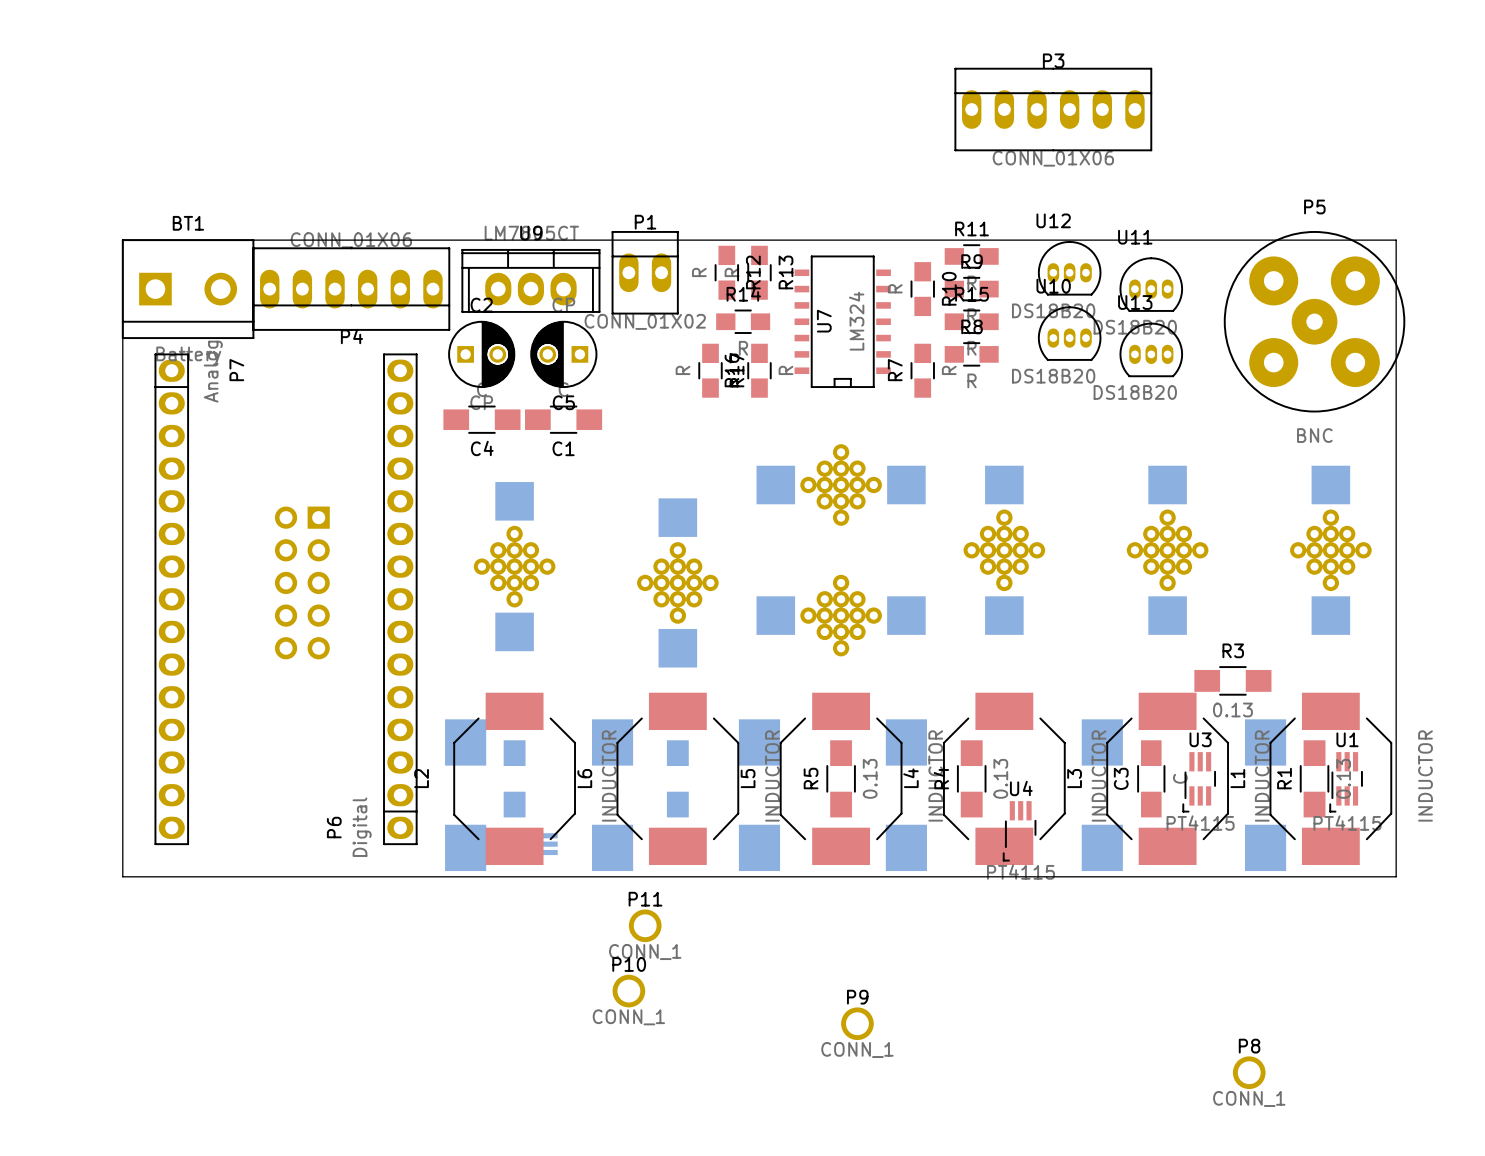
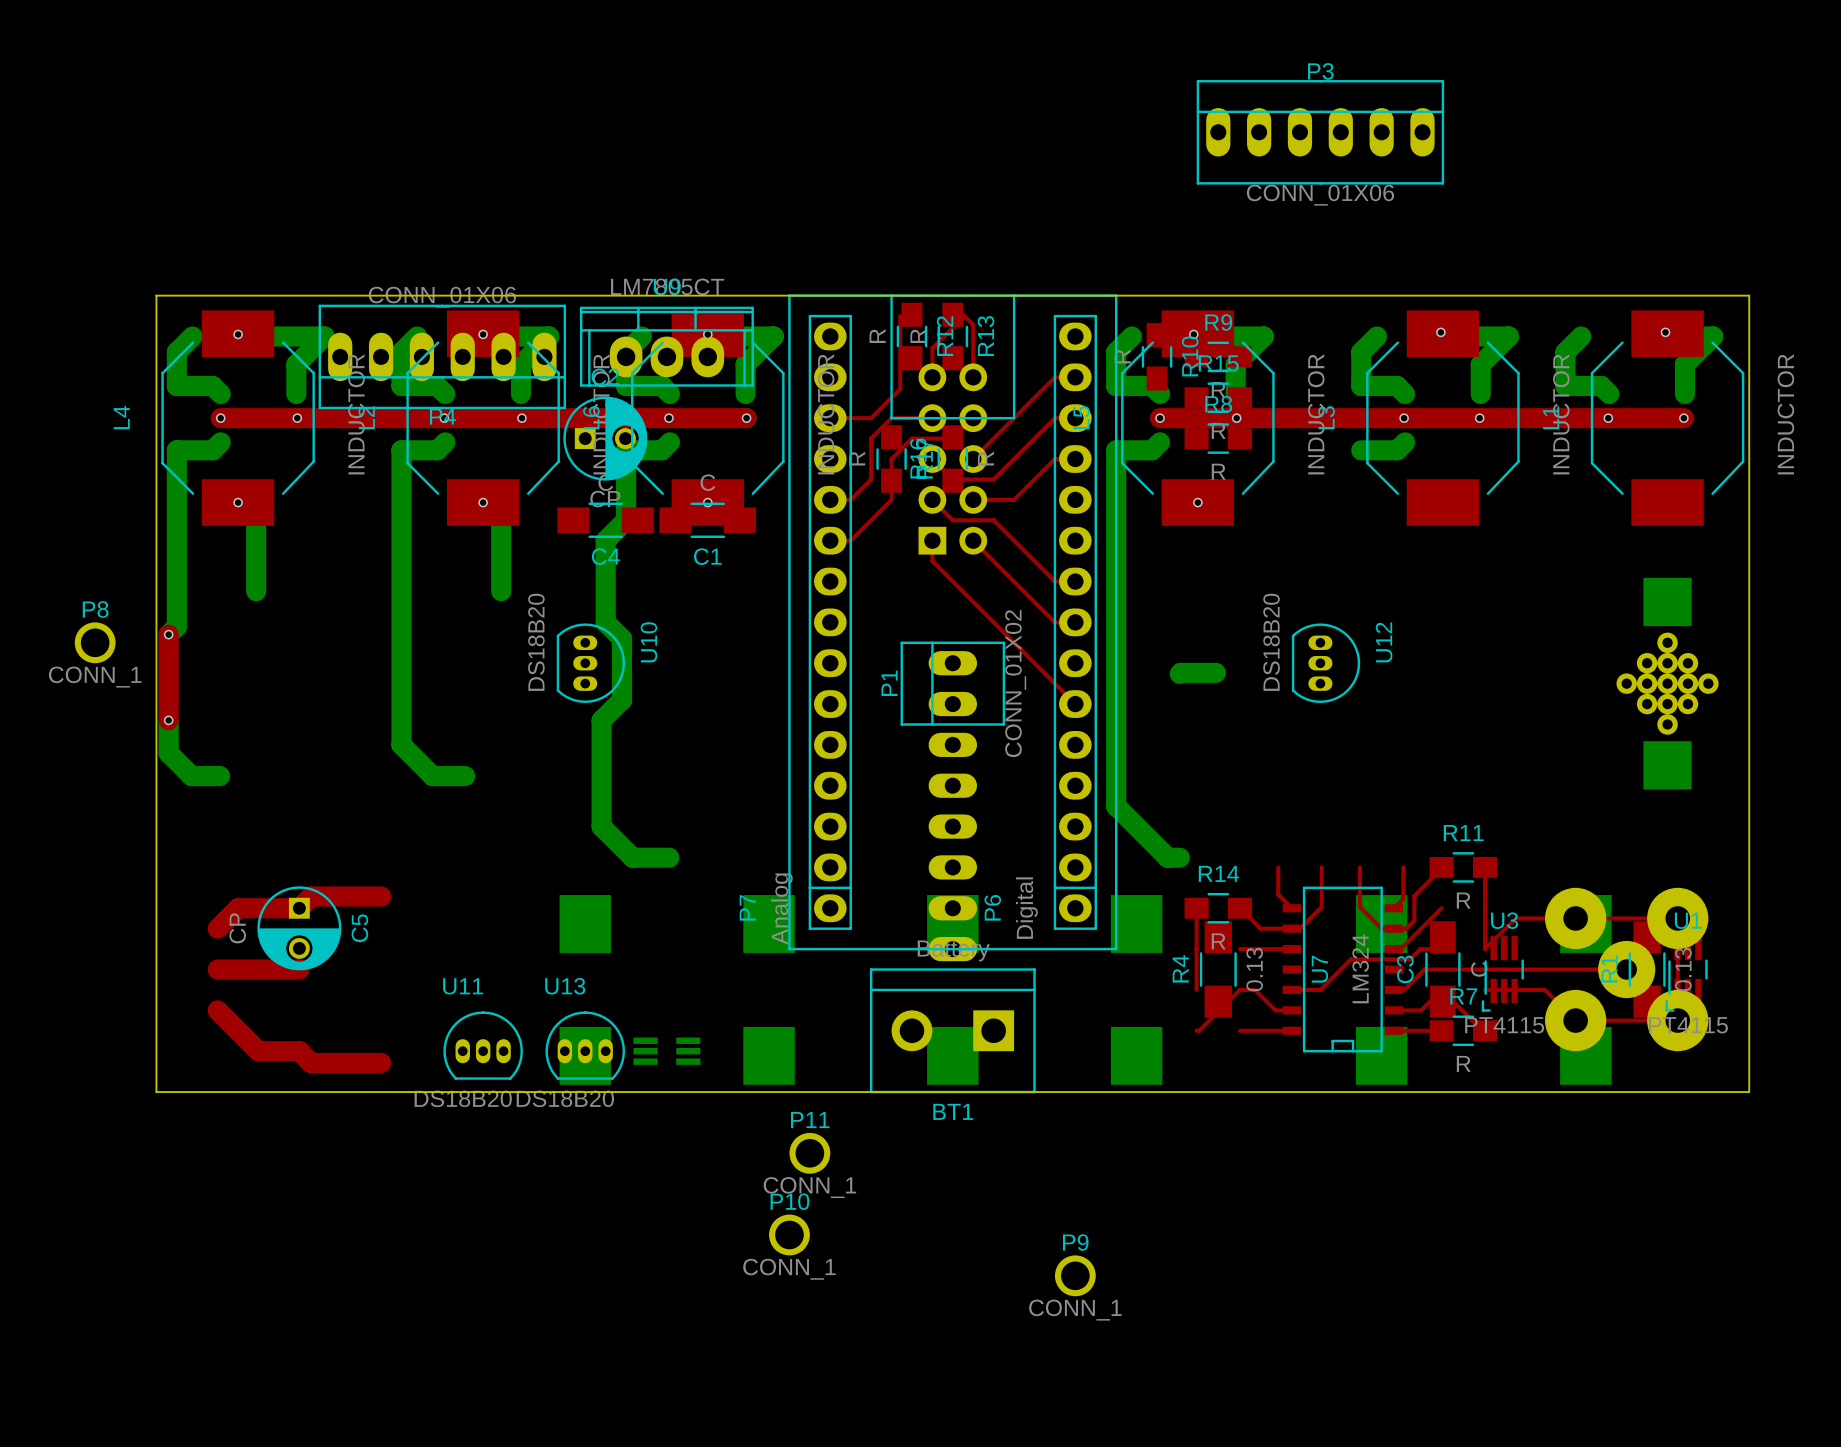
line: none -> (789, 295) (789, 949) (1116, 949) (1116, 295) (789, 295)
line: none -> (891, 295) (891, 418) (1014, 418) (1014, 295)
top track: none -> (900, 316) (900, 389) (871, 418) (830, 418)
R11 position: (971, 256) -> (1463, 867)
U12 rotation: 0° (1069, 268) -> 90° clockwise (1326, 663)
U12 position: (1069, 268) -> (1326, 663)
bottom track: none -> (1440, 332) (1444, 336) (1508, 336) (1480, 364) (1480, 394)
via: none -> (1440, 332)
bottom track: none -> (1665, 332) (1669, 336) (1713, 336) (1684, 364) (1684, 394)
via: none -> (1665, 332)
bottom track: none -> (238, 334) (240, 336) (324, 336) (296, 364) (296, 394)
via: none -> (238, 334)
bottom track: none -> (483, 334) (485, 336) (549, 336) (520, 364) (520, 394)
via: none -> (483, 334)
bottom track: none -> (707, 334) (709, 336) (773, 336) (745, 364) (745, 394)
via: none -> (707, 334)
bottom track: none -> (1193, 334) (1195, 336) (1263, 336) (1235, 364) (1235, 394)
via: none -> (1193, 334)
bottom track: none -> (192, 336) (176, 352) (176, 386) (212, 386) (220, 394)
bottom track: none -> (417, 336) (401, 352) (401, 386) (437, 386) (445, 394)
bottom track: none -> (641, 336) (626, 352) (626, 386) (661, 386) (669, 394)
P1 rotation: 0° (645, 272) -> 90° counterclockwise (952, 683)
P1 position: (645, 272) -> (952, 683)
bottom track: none -> (1131, 336) (1116, 352) (1116, 386) (1152, 386) (1160, 394)
bottom track: none -> (1376, 336) (1361, 352) (1361, 386) (1397, 386) (1405, 394)
bottom track: none -> (1581, 336) (1565, 352) (1565, 386) (1601, 386) (1609, 394)
U11 position: (1151, 284) -> (483, 1045)
BT1 rotation: 0° (188, 289) -> 180° (952, 1030)
BT1 position: (188, 289) -> (952, 1030)
top track: none -> (932, 377) (932, 348) (964, 316) (973, 324) (973, 377)
top track: none -> (1075, 377) (1054, 377) (973, 459)
R14 position: (743, 321) -> (1218, 908)
U7 position: (842, 321) -> (1342, 969)
P5: BNC (1314, 321) -> none
U10 rotation: 0° (1069, 333) -> 90° clockwise (590, 663)
U10 position: (1069, 333) -> (590, 663)
top track: none -> (220, 418) (746, 418)
via: none -> (220, 418)
via: none -> (297, 418)
via: none -> (444, 418)
via: none -> (521, 418)
via: none -> (668, 418)
via: none -> (746, 418)
top track: none -> (932, 418) (891, 418) (871, 438) (871, 479) (850, 499) (830, 499)
top track: none -> (973, 418) (952, 438) (911, 438) (891, 459) (891, 499) (850, 540) (830, 540)
top track: none -> (1075, 418) (1054, 418) (993, 479) (952, 479) (932, 459)
top track: none -> (1160, 418) (1683, 418)
via: none -> (1160, 418)
via: none -> (1236, 418)
via: none -> (1404, 418)
via: none -> (1479, 418)
via: none -> (1608, 418)
via: none -> (1683, 418)
U13 position: (1151, 349) -> (585, 1045)
C5 rotation: 0° (563, 354) -> 90° counterclockwise (299, 928)
C5 position: (563, 354) -> (299, 928)
bottom track: none -> (220, 442) (212, 450) (176, 450) (176, 626) (168, 634)
bottom track: none -> (445, 442) (437, 450) (401, 450) (401, 744) (432, 776) (465, 776)
bottom track: none -> (669, 442) (661, 450) (626, 450) (626, 520) (605, 540) (605, 622) (622, 638) (622, 699) (601, 720) (601, 826) (632, 857) (669, 857)
bottom track: none -> (1160, 442) (1152, 450) (1116, 450) (1116, 806) (1167, 857) (1179, 857)
bottom track: none -> (1405, 442) (1397, 450) (1361, 450)
part: none -> (952, 459)
top track: none -> (1075, 459) (1054, 459) (1014, 499) (973, 499)
R7 rotation: 0° (922, 370) -> 90° clockwise (1463, 1030)
R7 position: (922, 370) -> (1463, 1030)
top track: none -> (932, 499) (952, 520) (993, 520) (1054, 581) (1075, 581)
bottom track: none -> (238, 502) (256, 520) (256, 591)
via: none -> (238, 502)
bottom track: none -> (483, 502) (501, 520) (501, 591)
via: none -> (483, 502)
via: none -> (707, 502)
via: none -> (1197, 502)
top track: none -> (932, 540) (932, 561) (1075, 704)
top track: none -> (973, 540) (1054, 622) (1075, 622)
part: (841, 484) -> none
top track: none -> (168, 634) (168, 720)
via: none -> (168, 634)
bottom track: none -> (1215, 672) (1179, 673)
part: (1004, 550) -> none
part: (1167, 550) -> none
part: (514, 566) -> none
bottom track: none -> (168, 720) (168, 753) (191, 776) (220, 776)
via: none -> (168, 720)
part: (302, 582) -> none
part: (677, 582) -> none
P7 rotation: 0° (171, 599) -> 180° (830, 622)
P7 position: (171, 599) -> (830, 622)
P6 position: (400, 599) -> (1075, 622)
part: (841, 615) -> none
part: none -> (952, 846)
R3: 0.13 (1232, 680) -> none
top track: none -> (1278, 867) (1278, 894) (1291, 908)
top track: none -> (1321, 867) (1321, 906) (1299, 928) (1260, 928) (1240, 908)
top track: none -> (1359, 867) (1359, 906) (1381, 928) (1406, 928) (1414, 920) (1414, 896) (1441, 867)
top track: none -> (1403, 867) (1403, 898) (1393, 908)
top track: none -> (1485, 867) (1485, 949) (1515, 918) (1677, 918) (1677, 1020) (1575, 1020) (1545, 989) (1485, 989)
top track: none -> (381, 896) (311, 896) (299, 908) (238, 908) (217, 928)
top track: none -> (1196, 908) (1196, 989)
top track: none -> (1441, 908) (1400, 949) (1393, 949)
top track: none -> (1240, 949) (1291, 949)
top track: none -> (1441, 949) (1420, 949) (1410, 959) (1351, 959) (1320, 989) (1291, 989)
top track: none -> (217, 969) (299, 969)
L2 position: (514, 778) -> (483, 418)
part: (514, 778) -> none
L6 position: (677, 778) -> (707, 418)
part: (677, 778) -> none
L5 position: (841, 778) -> (1197, 418)
R5: 0.13 (841, 778) -> none
L4 position: (1004, 778) -> (238, 418)
L3 position: (1167, 778) -> (1442, 418)
top track: none -> (1626, 969) (1424, 969) (1404, 989) (1393, 989)
part: none -> (1626, 969)
L1 position: (1330, 778) -> (1667, 418)
top track: none -> (217, 1010) (258, 1051) (299, 1051) (311, 1062) (381, 1062)
top track: none -> (1291, 1010) (1275, 1010) (1255, 989) (1240, 989) (1199, 1030) (1196, 1030)
top track: none -> (1393, 1010) (1421, 1010) (1441, 989) (1482, 1030) (1485, 1030)
top track: none -> (1240, 1030) (1291, 1030)
top track: none -> (1393, 1030) (1441, 1030)
U4: PT4115 (1019, 831) -> none
P8 position: (1249, 1072) -> (95, 642)

